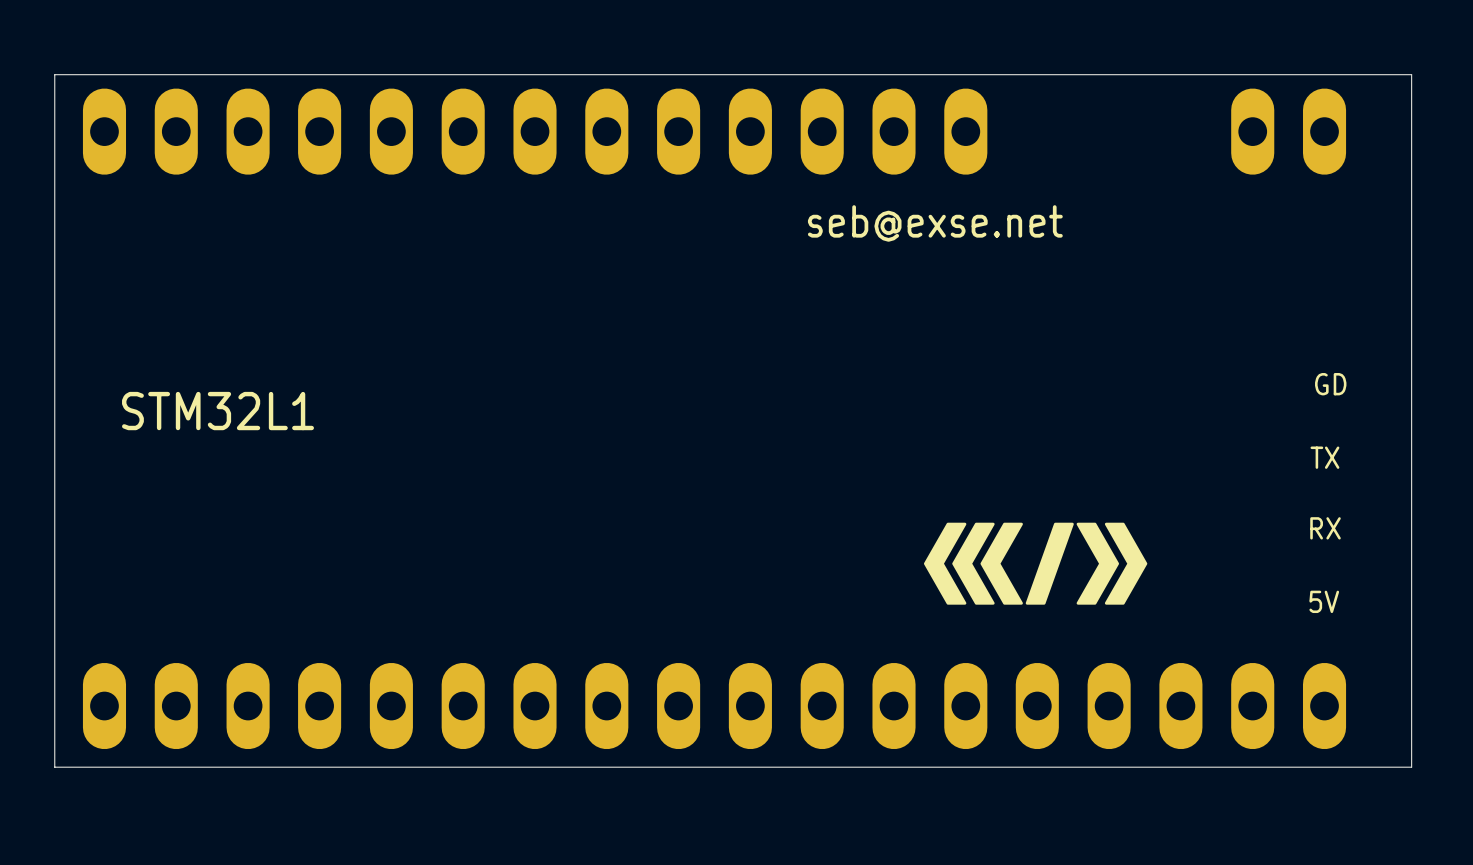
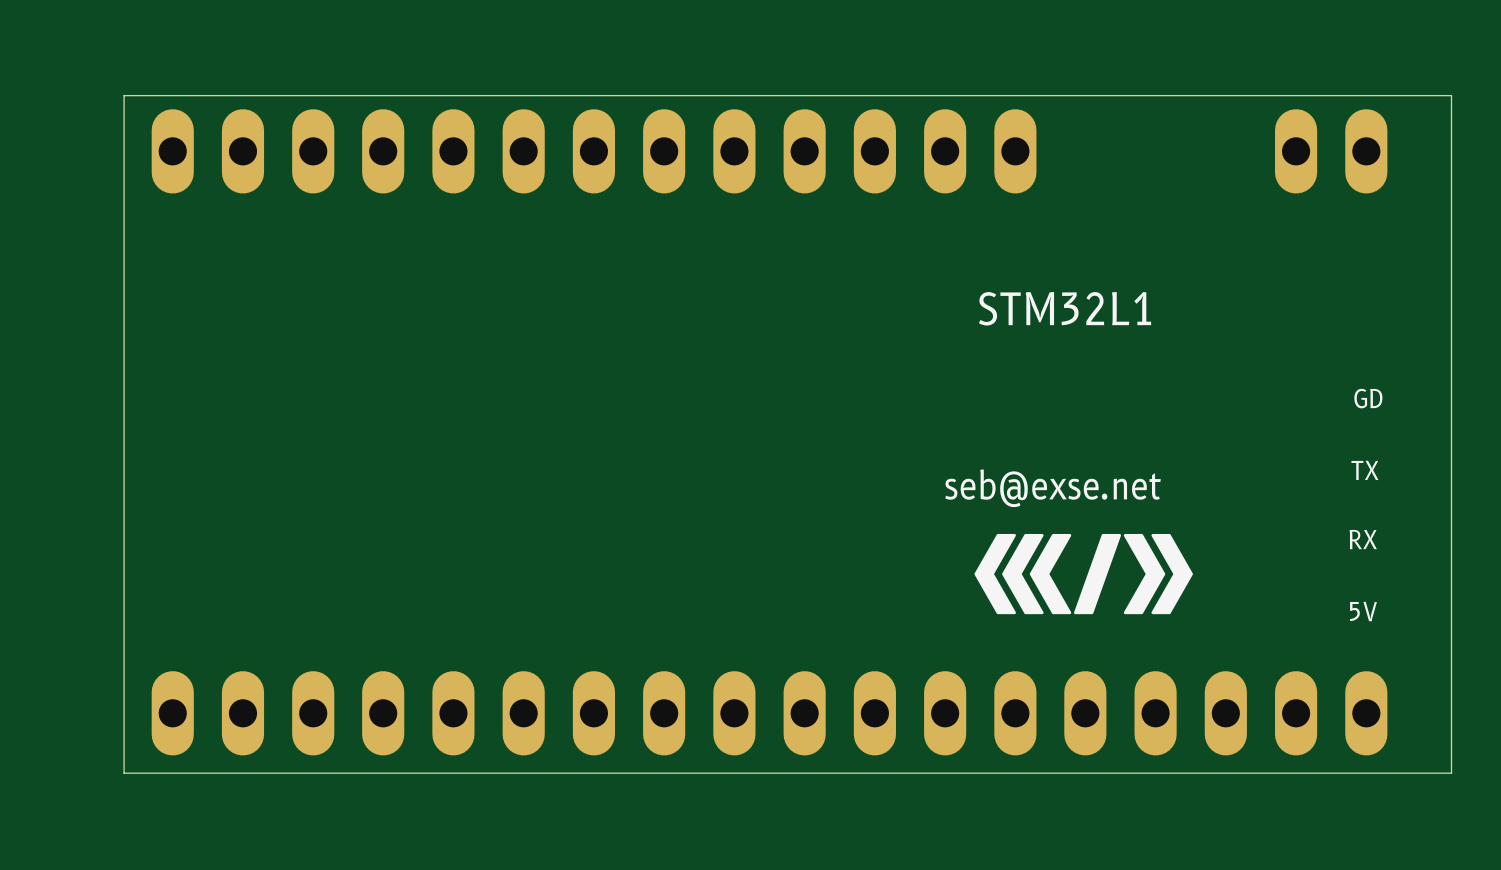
text position: seb@exse.net (935, 223) -> seb@exse.net (1052, 488)
text: none -> STM32L1 (1064, 308)
text: STM32L1 (217, 411) -> none

